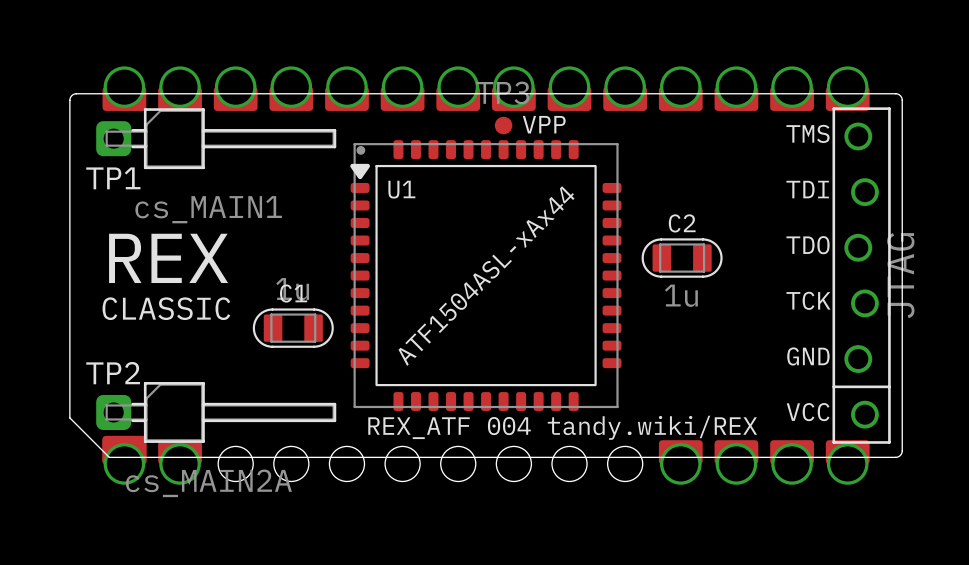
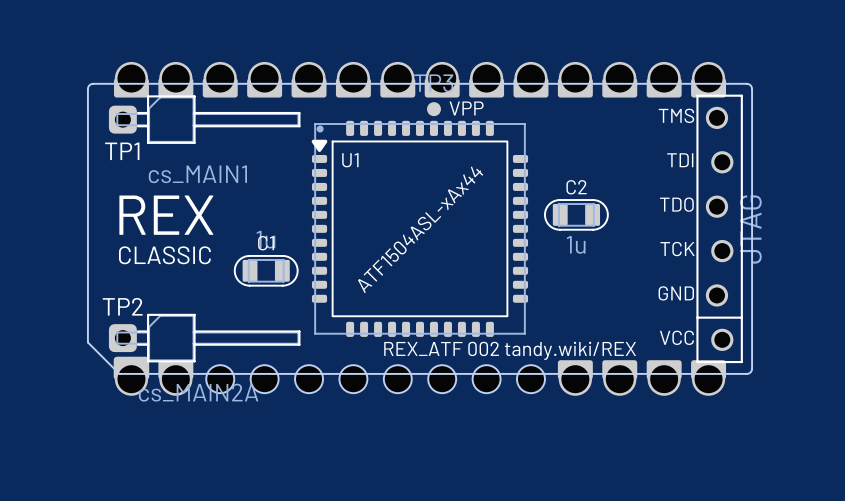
text: REX_ATF 004 tandy.wiki/REX (562, 427) -> REX_ATF 002 tandy.wiki/REX (510, 350)

